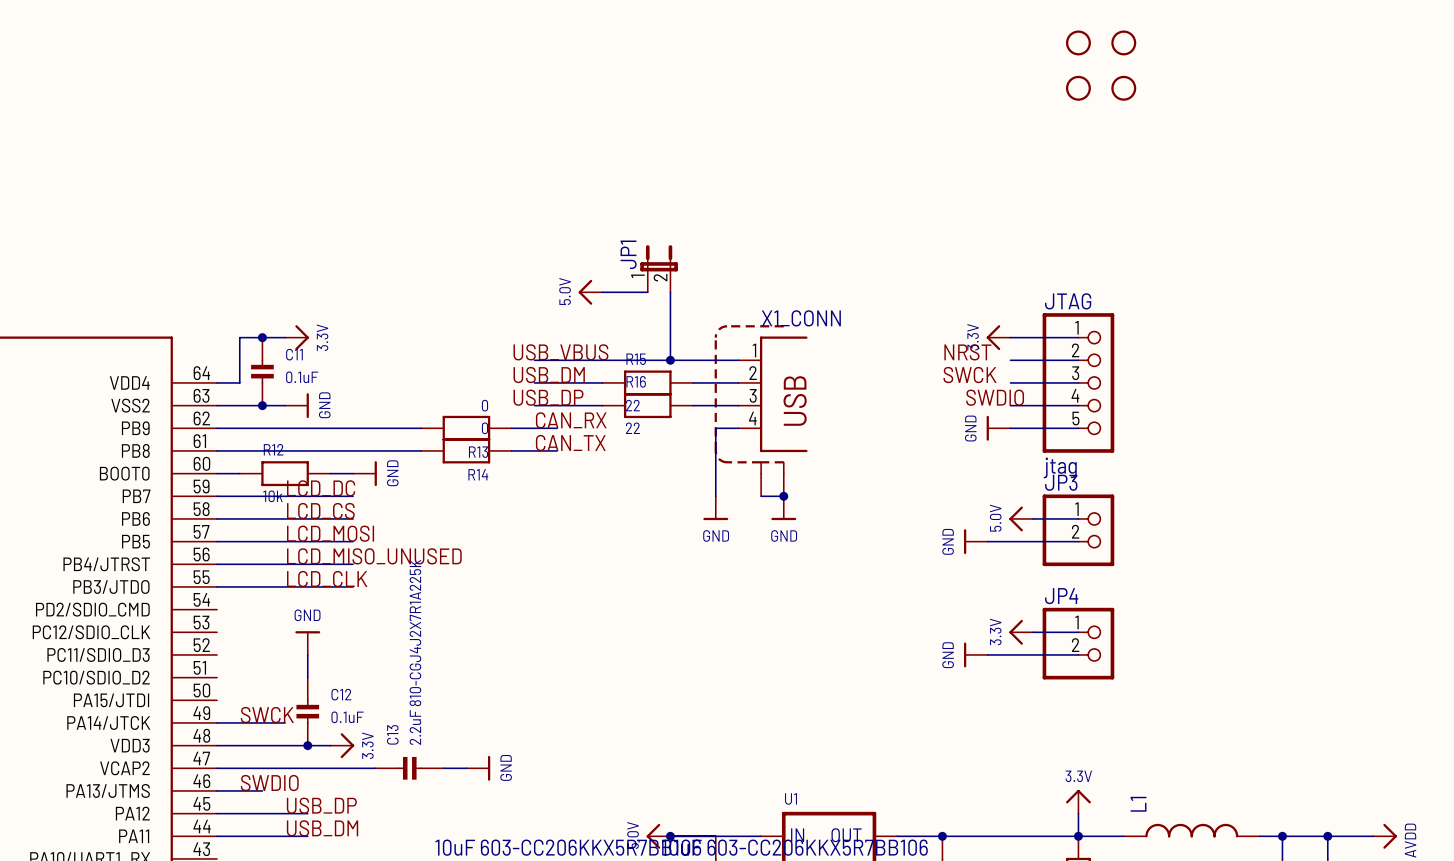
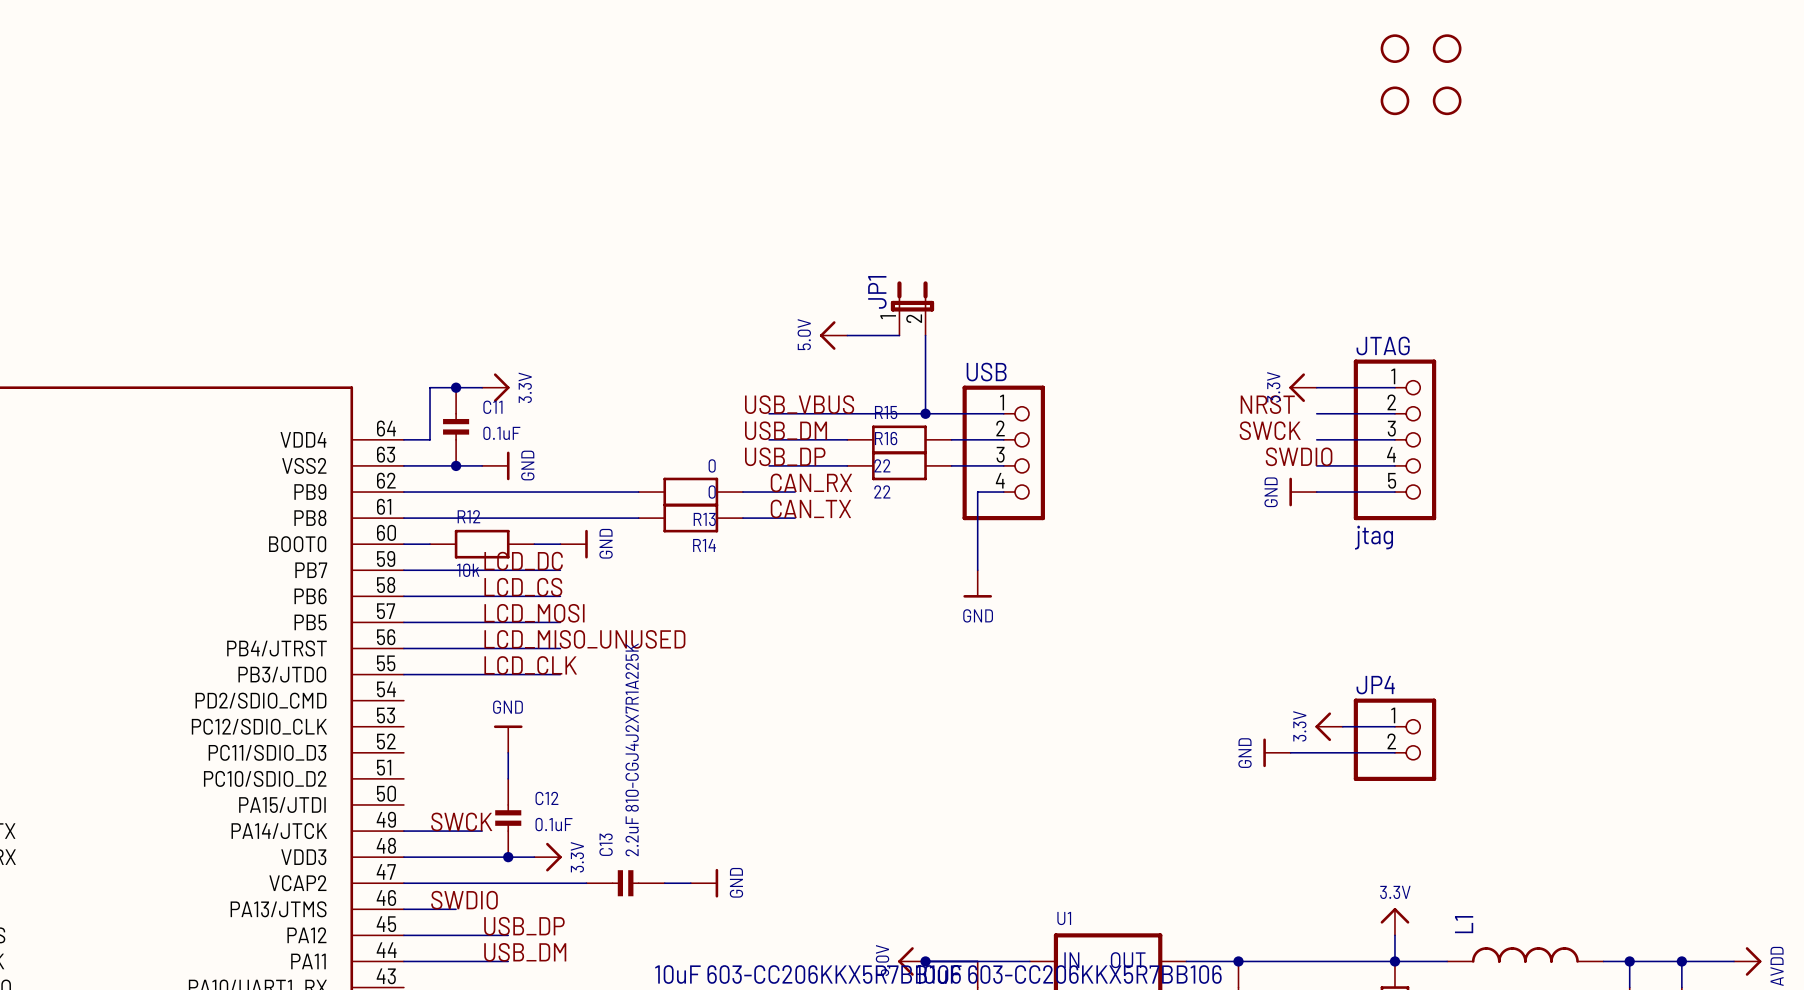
USB: none -> (1003, 452)
X1_CONN: (773, 394) -> none
part: (749, 410) -> none
wire: (761, 496) (783, 496) -> none
junction: (783, 496) -> none
power symbol: GND (783, 508) -> none
power symbol: 5.0V (1021, 518) -> none
wire: (1033, 518) (1078, 518) -> none
JP3: (1078, 530) -> none
power symbol: GND (975, 541) -> none
wire: (987, 541) (1078, 541) -> none

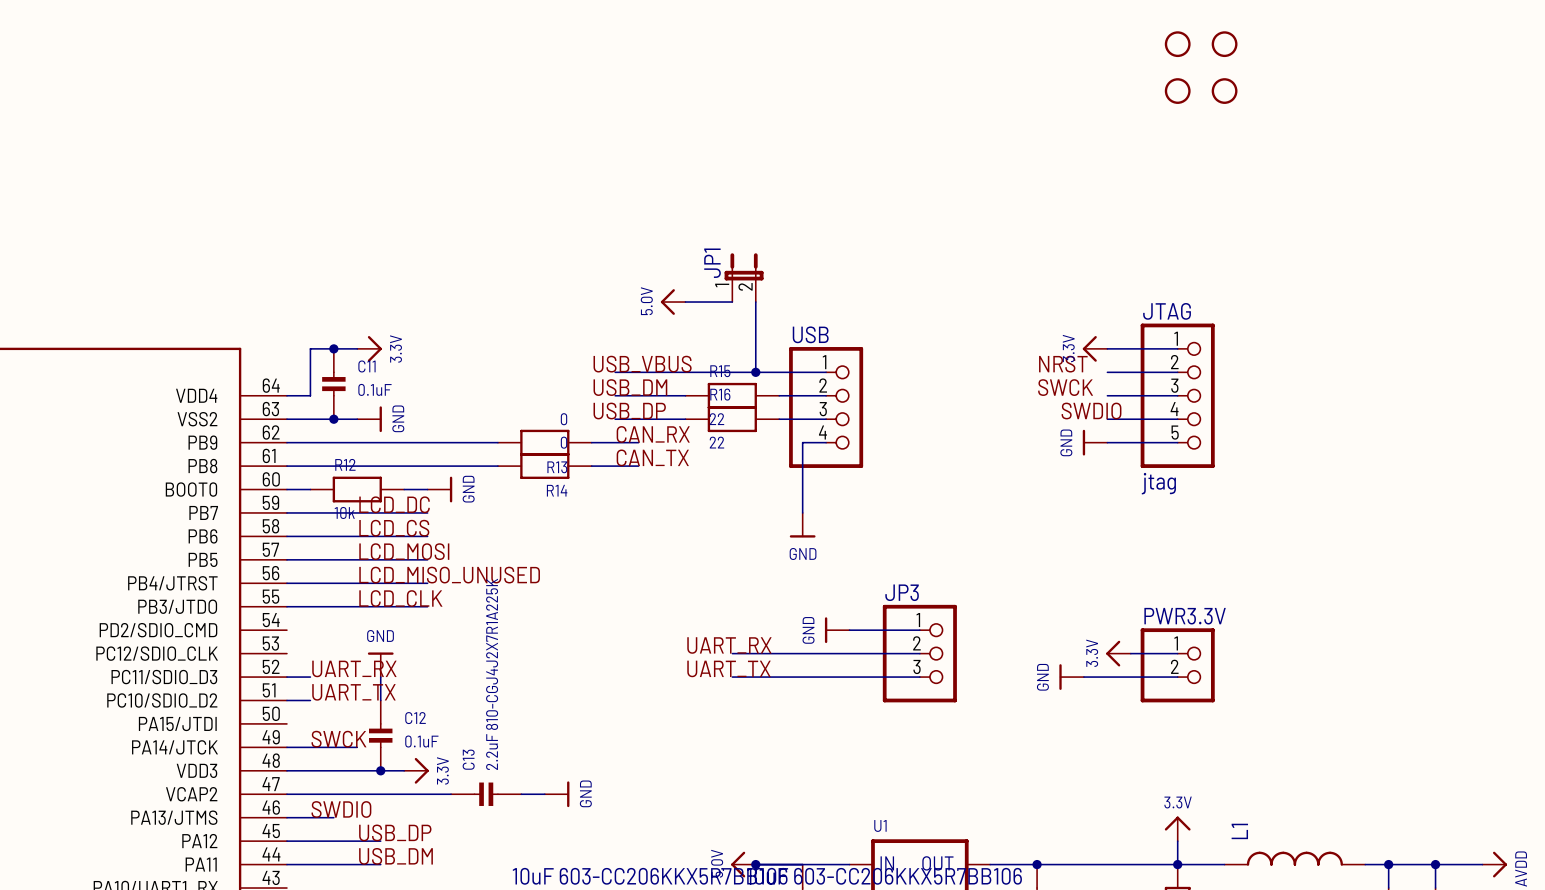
JP4 name: JP4 (1375, 685) -> PWR3.3V (1185, 616)
power symbol: none -> GND (837, 630)
wire: none -> (849, 630) (919, 630)
label: none -> UART_RX (729, 645)
wire: none -> (732, 653) (919, 653)
JP3: none -> (919, 653)
label: none -> UART_RX (354, 668)
label: none -> UART_TX (728, 668)
wire: none -> (286, 677) (310, 677)
wire: none -> (732, 677) (919, 677)
label: none -> UART_TX (353, 692)
wire: none -> (286, 700) (310, 700)

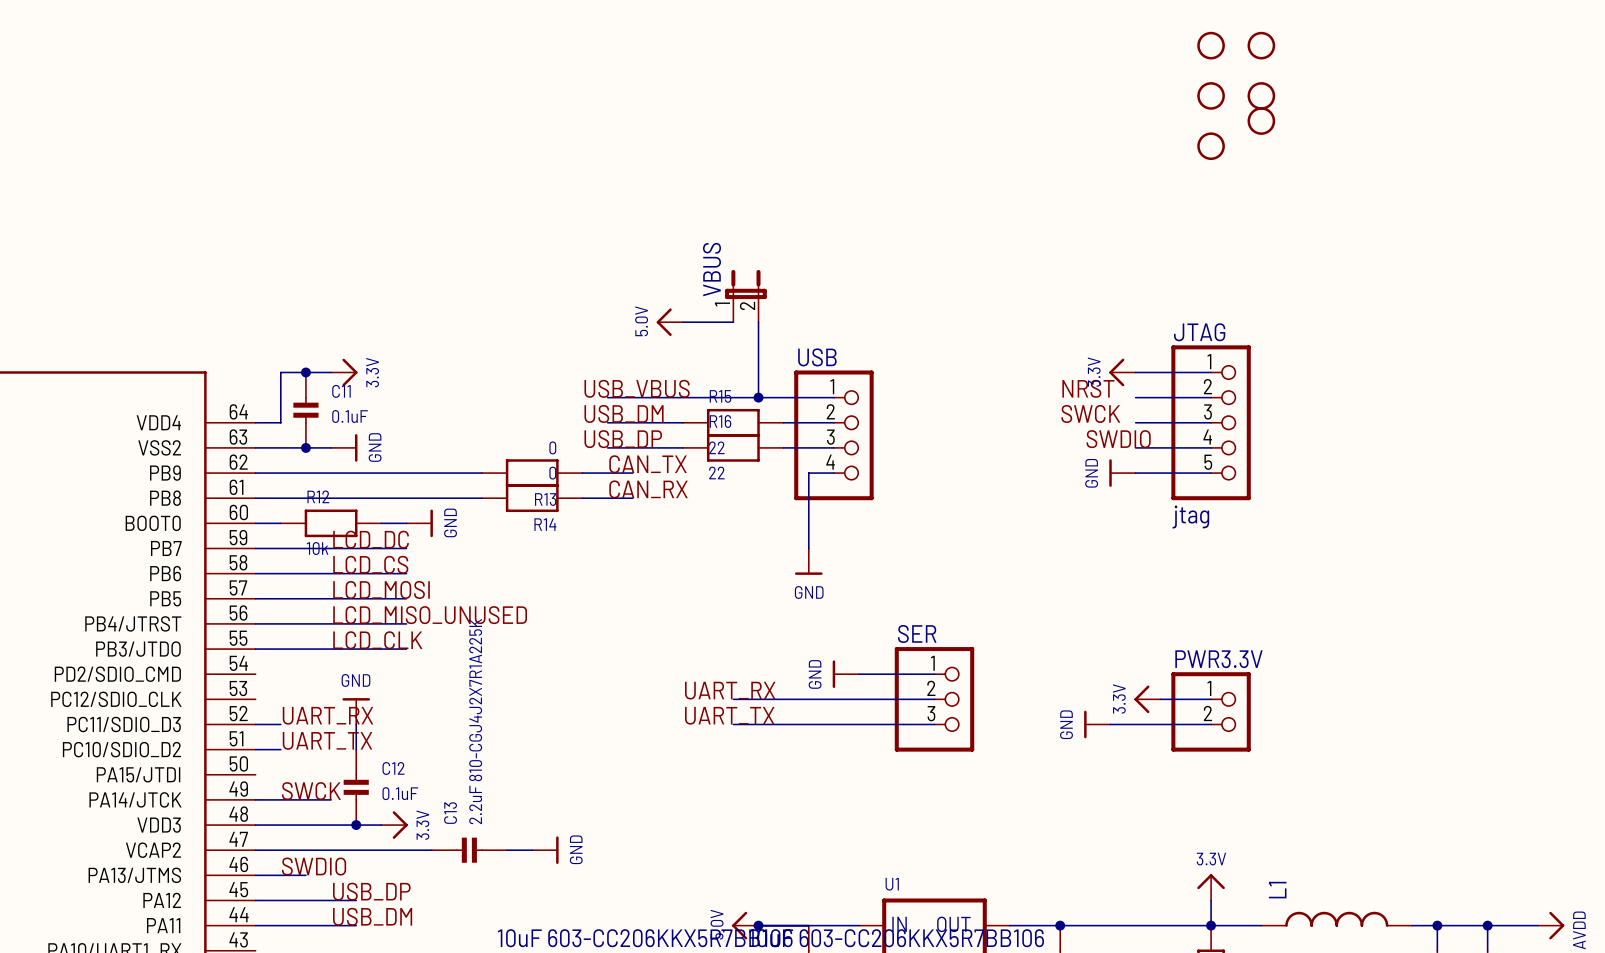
part: none -> (1261, 121)
part: none -> (1211, 146)
JP1 name: JP1 (712, 263) -> VBUS (711, 269)
label: CAN_RX (653, 434) -> CAN_TX (648, 464)
label: CAN_TX (652, 457) -> CAN_RX (648, 489)
JP3 name: JP3 (902, 592) -> SER (917, 633)

